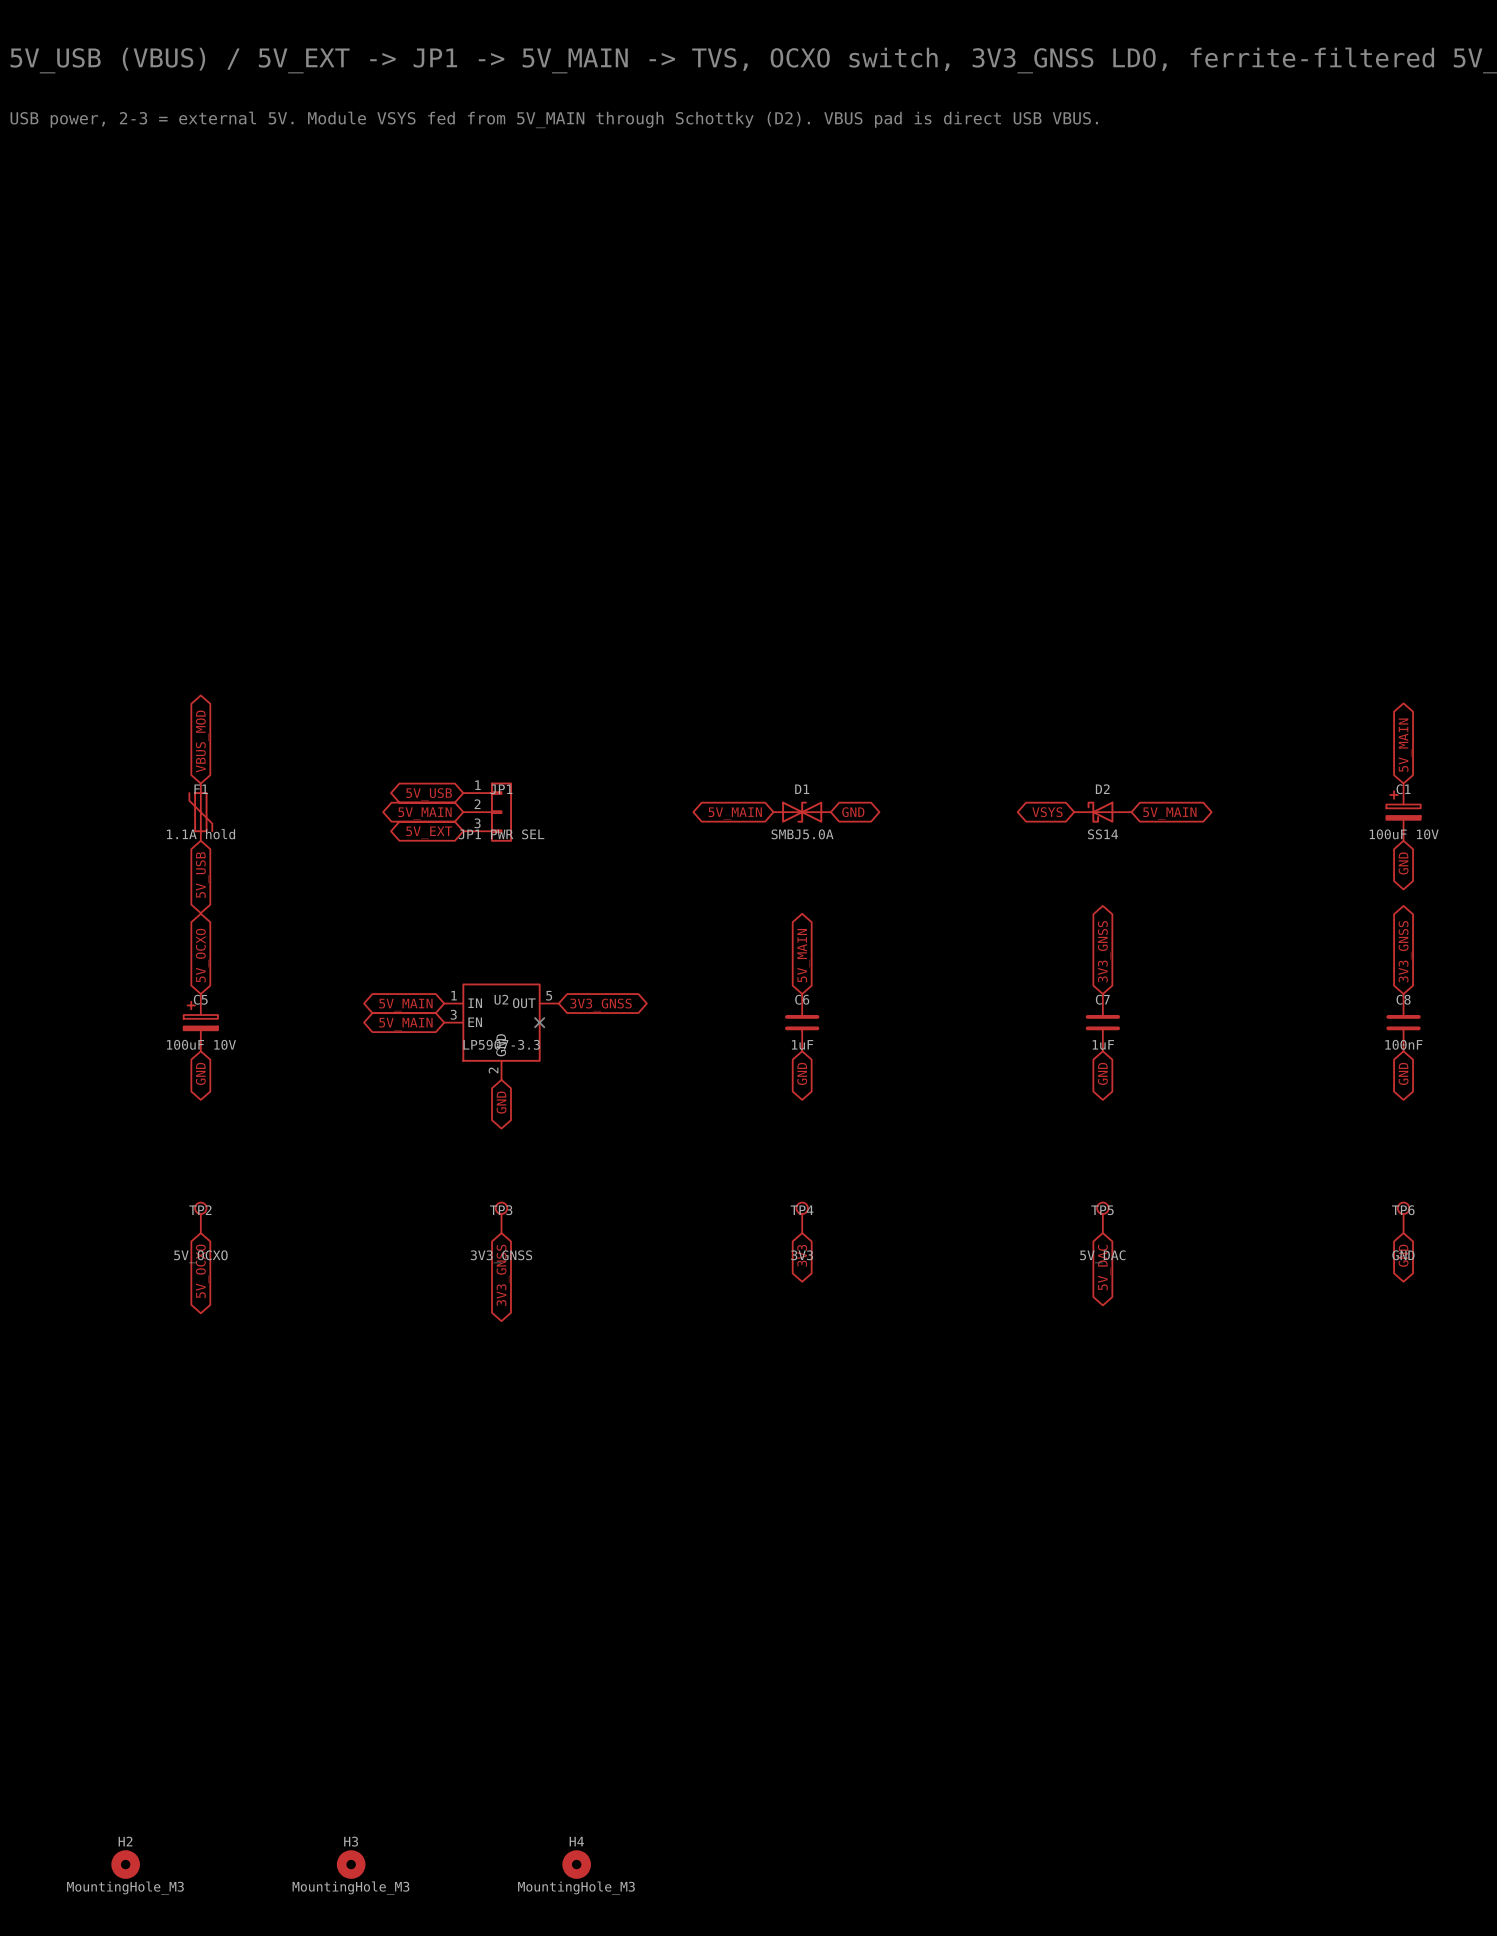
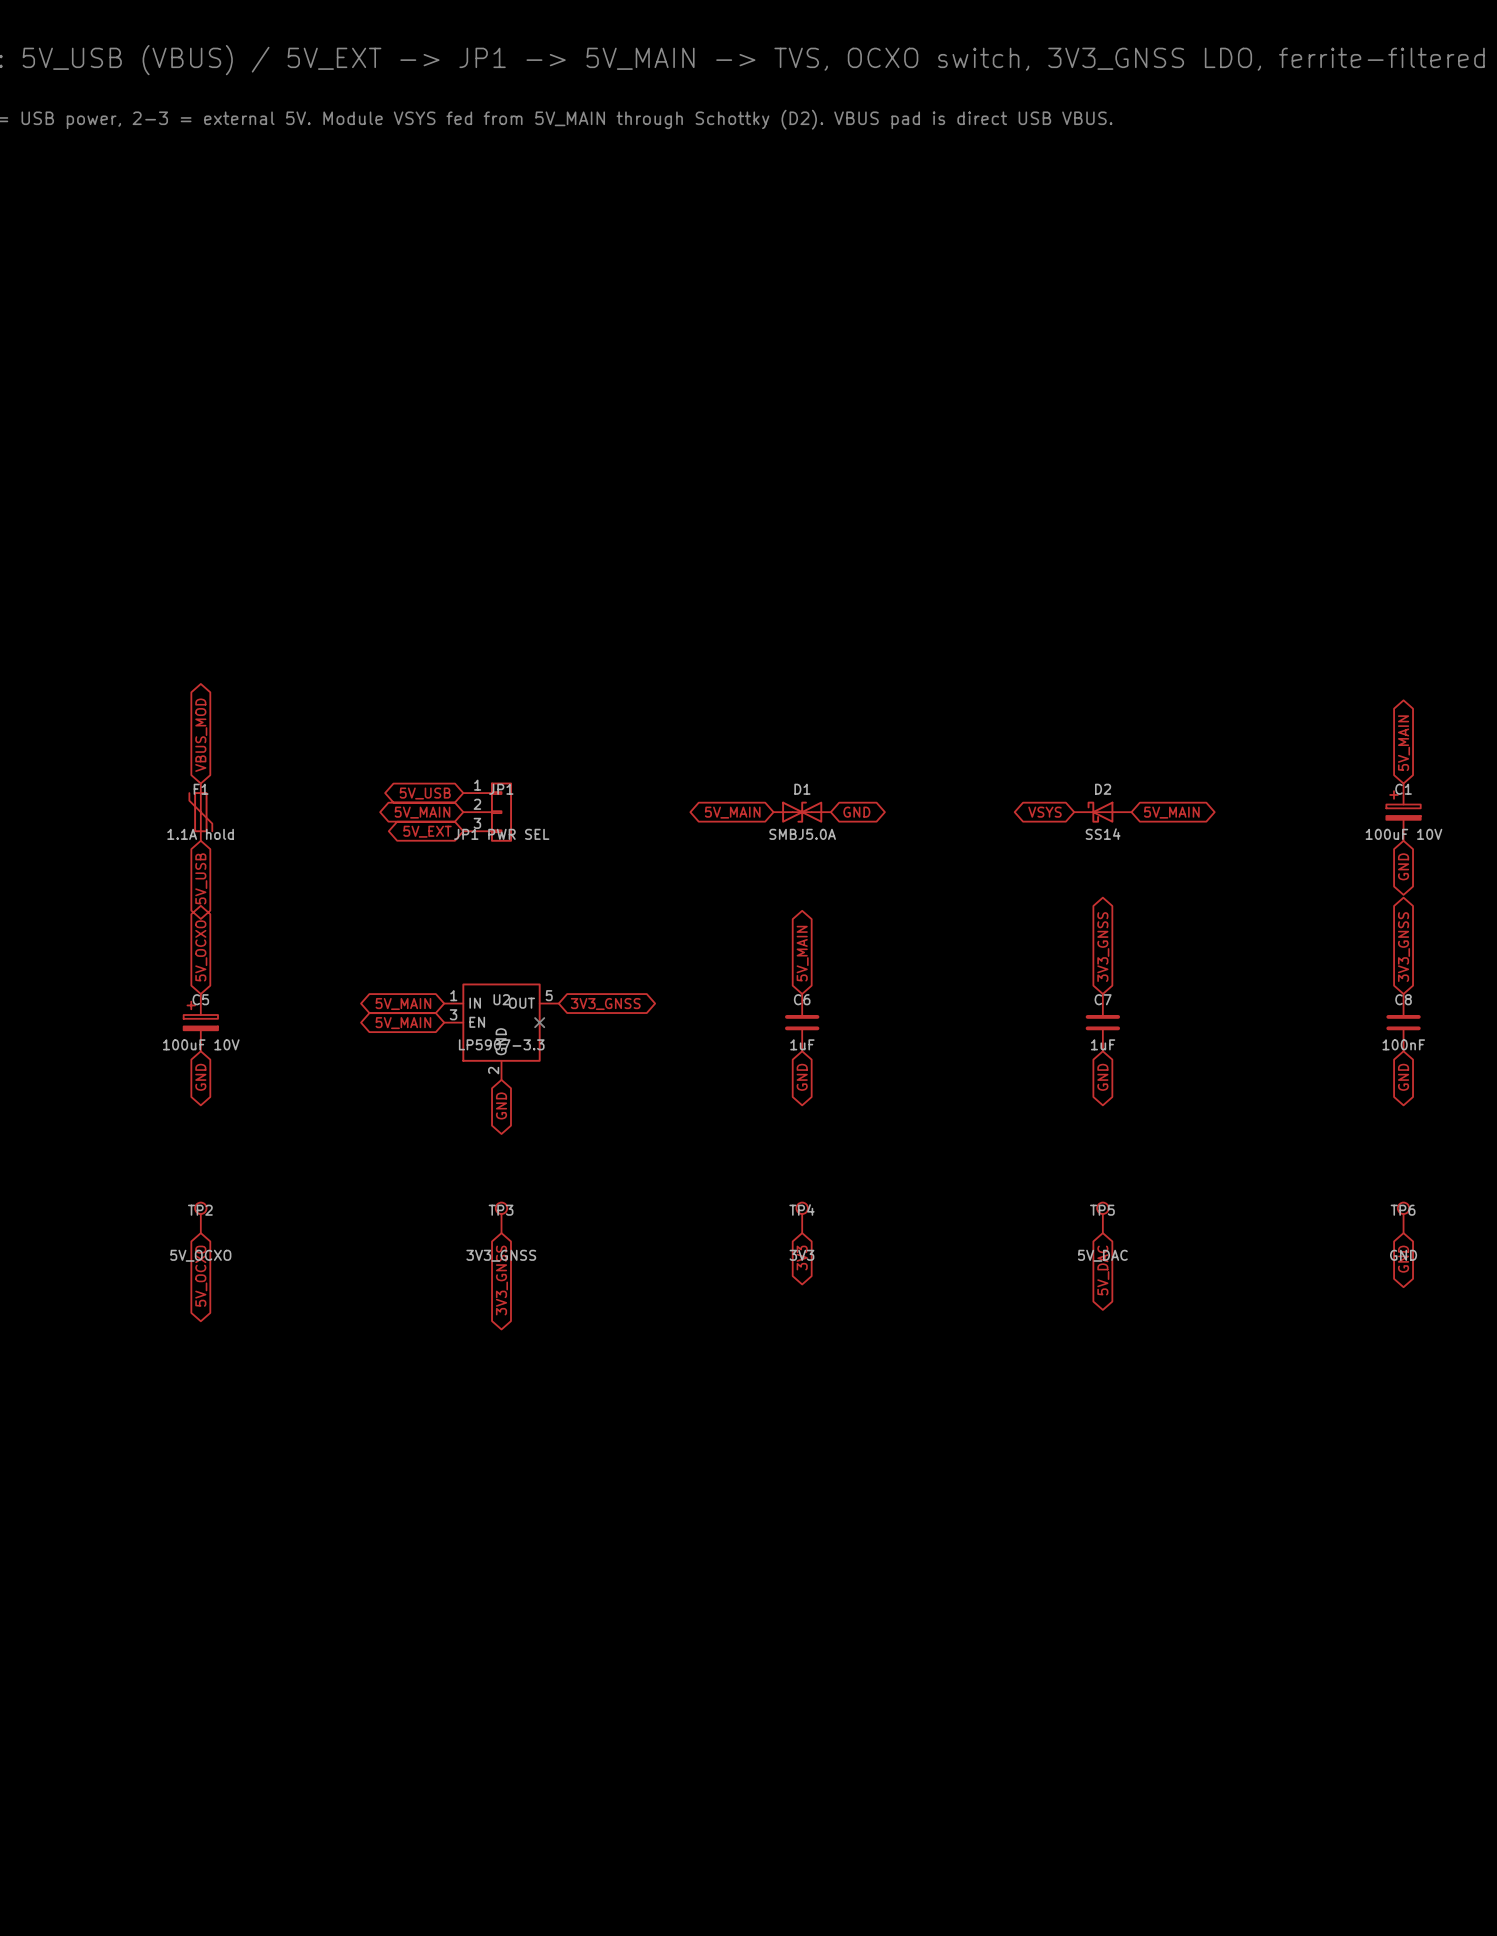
H2: MountingHole_M3 (125, 1864) -> none
H3: MountingHole_M3 (351, 1864) -> none
H4: MountingHole_M3 (576, 1864) -> none

